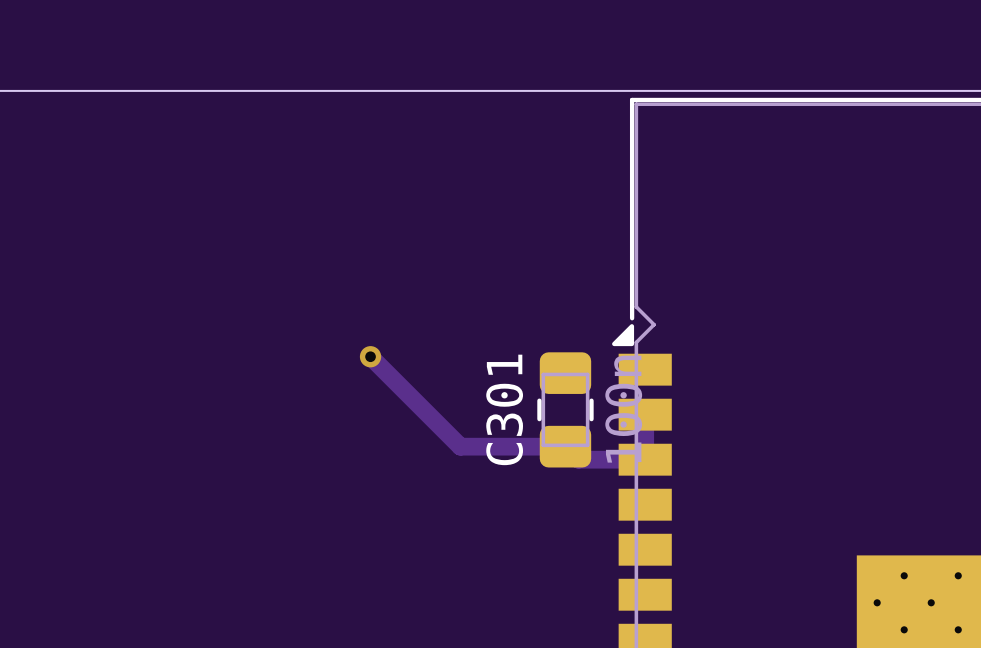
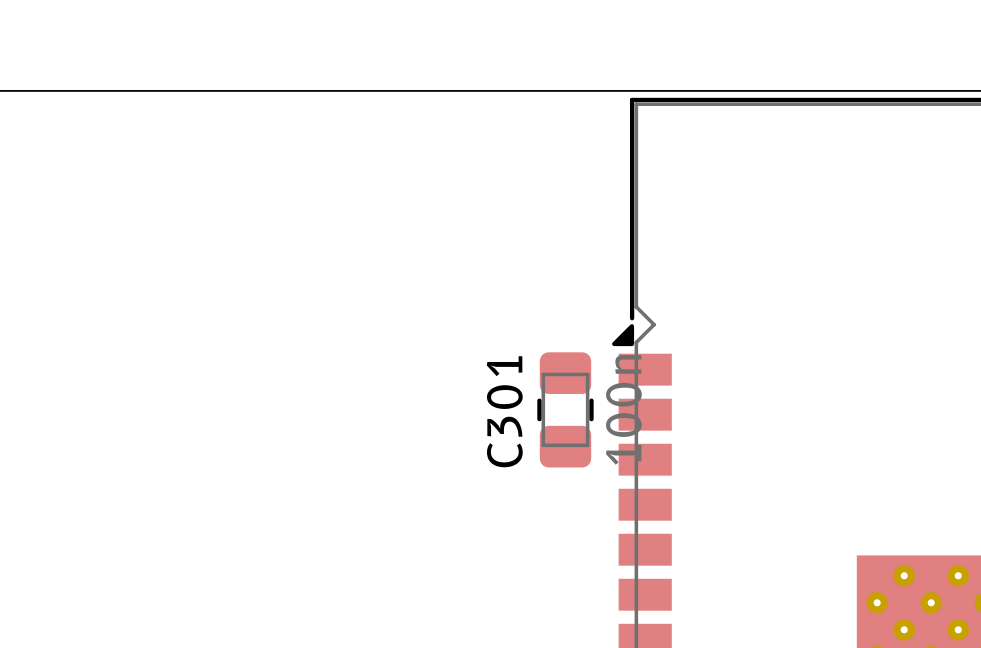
track: (370, 356) (460, 446) (565, 446) (578, 459) (645, 459) (645, 414) -> none
via: (370, 356) -> none

